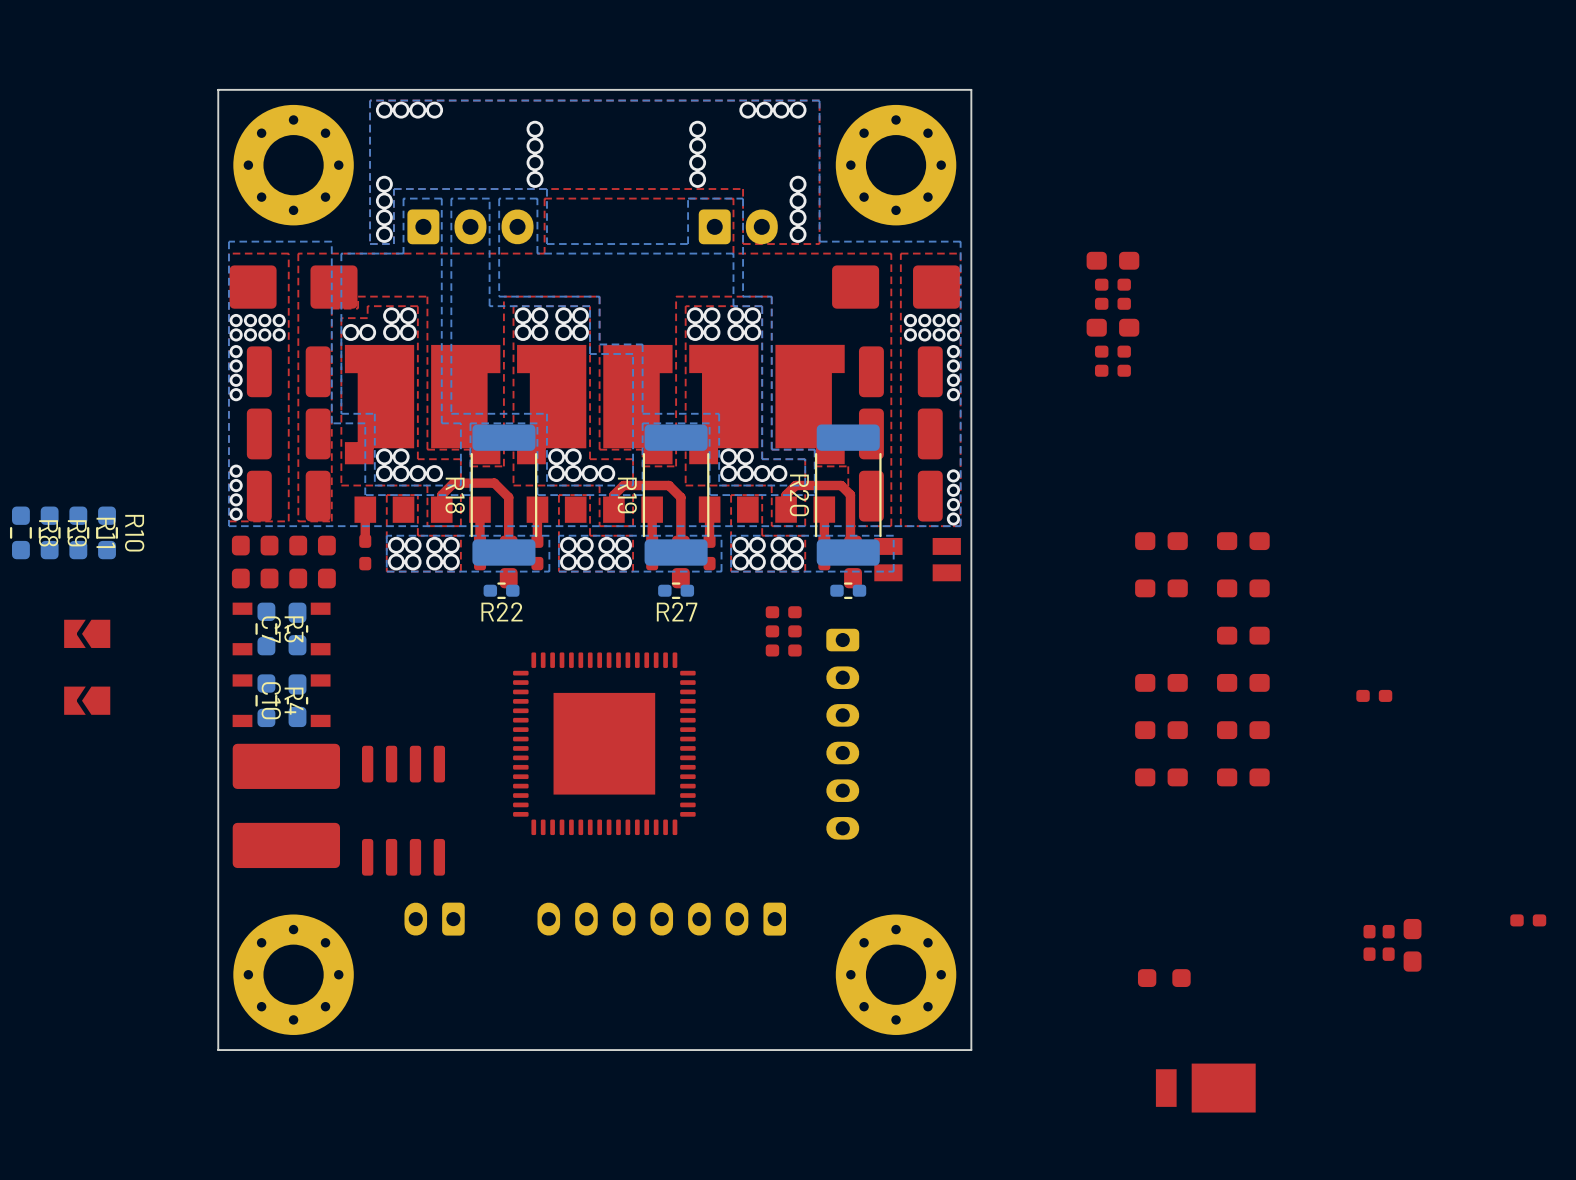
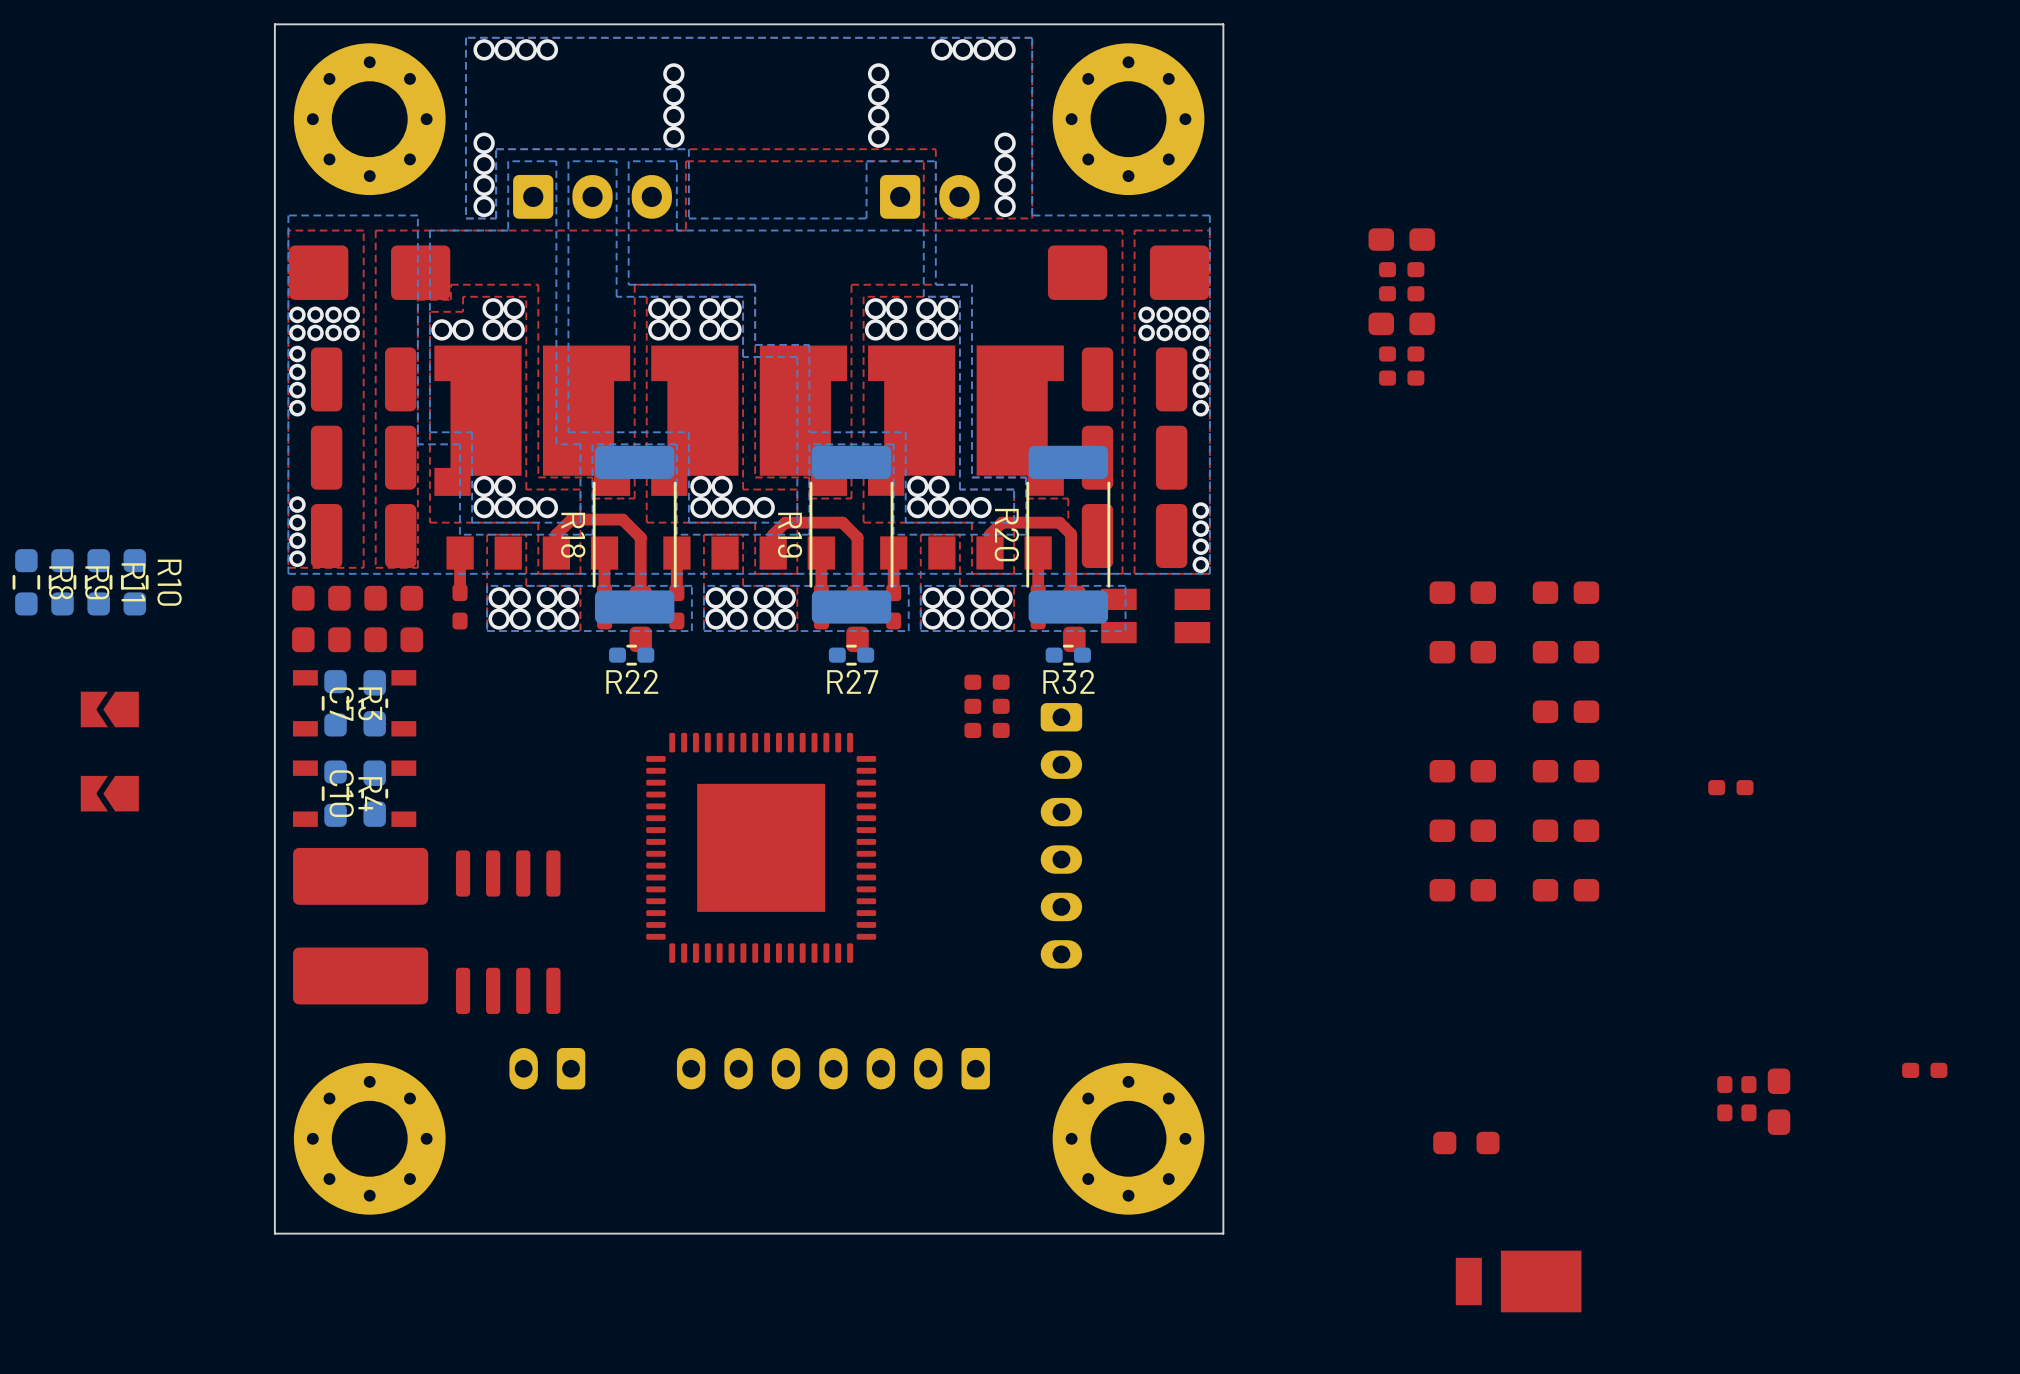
R32 name: none -> R32 (1068, 681)

